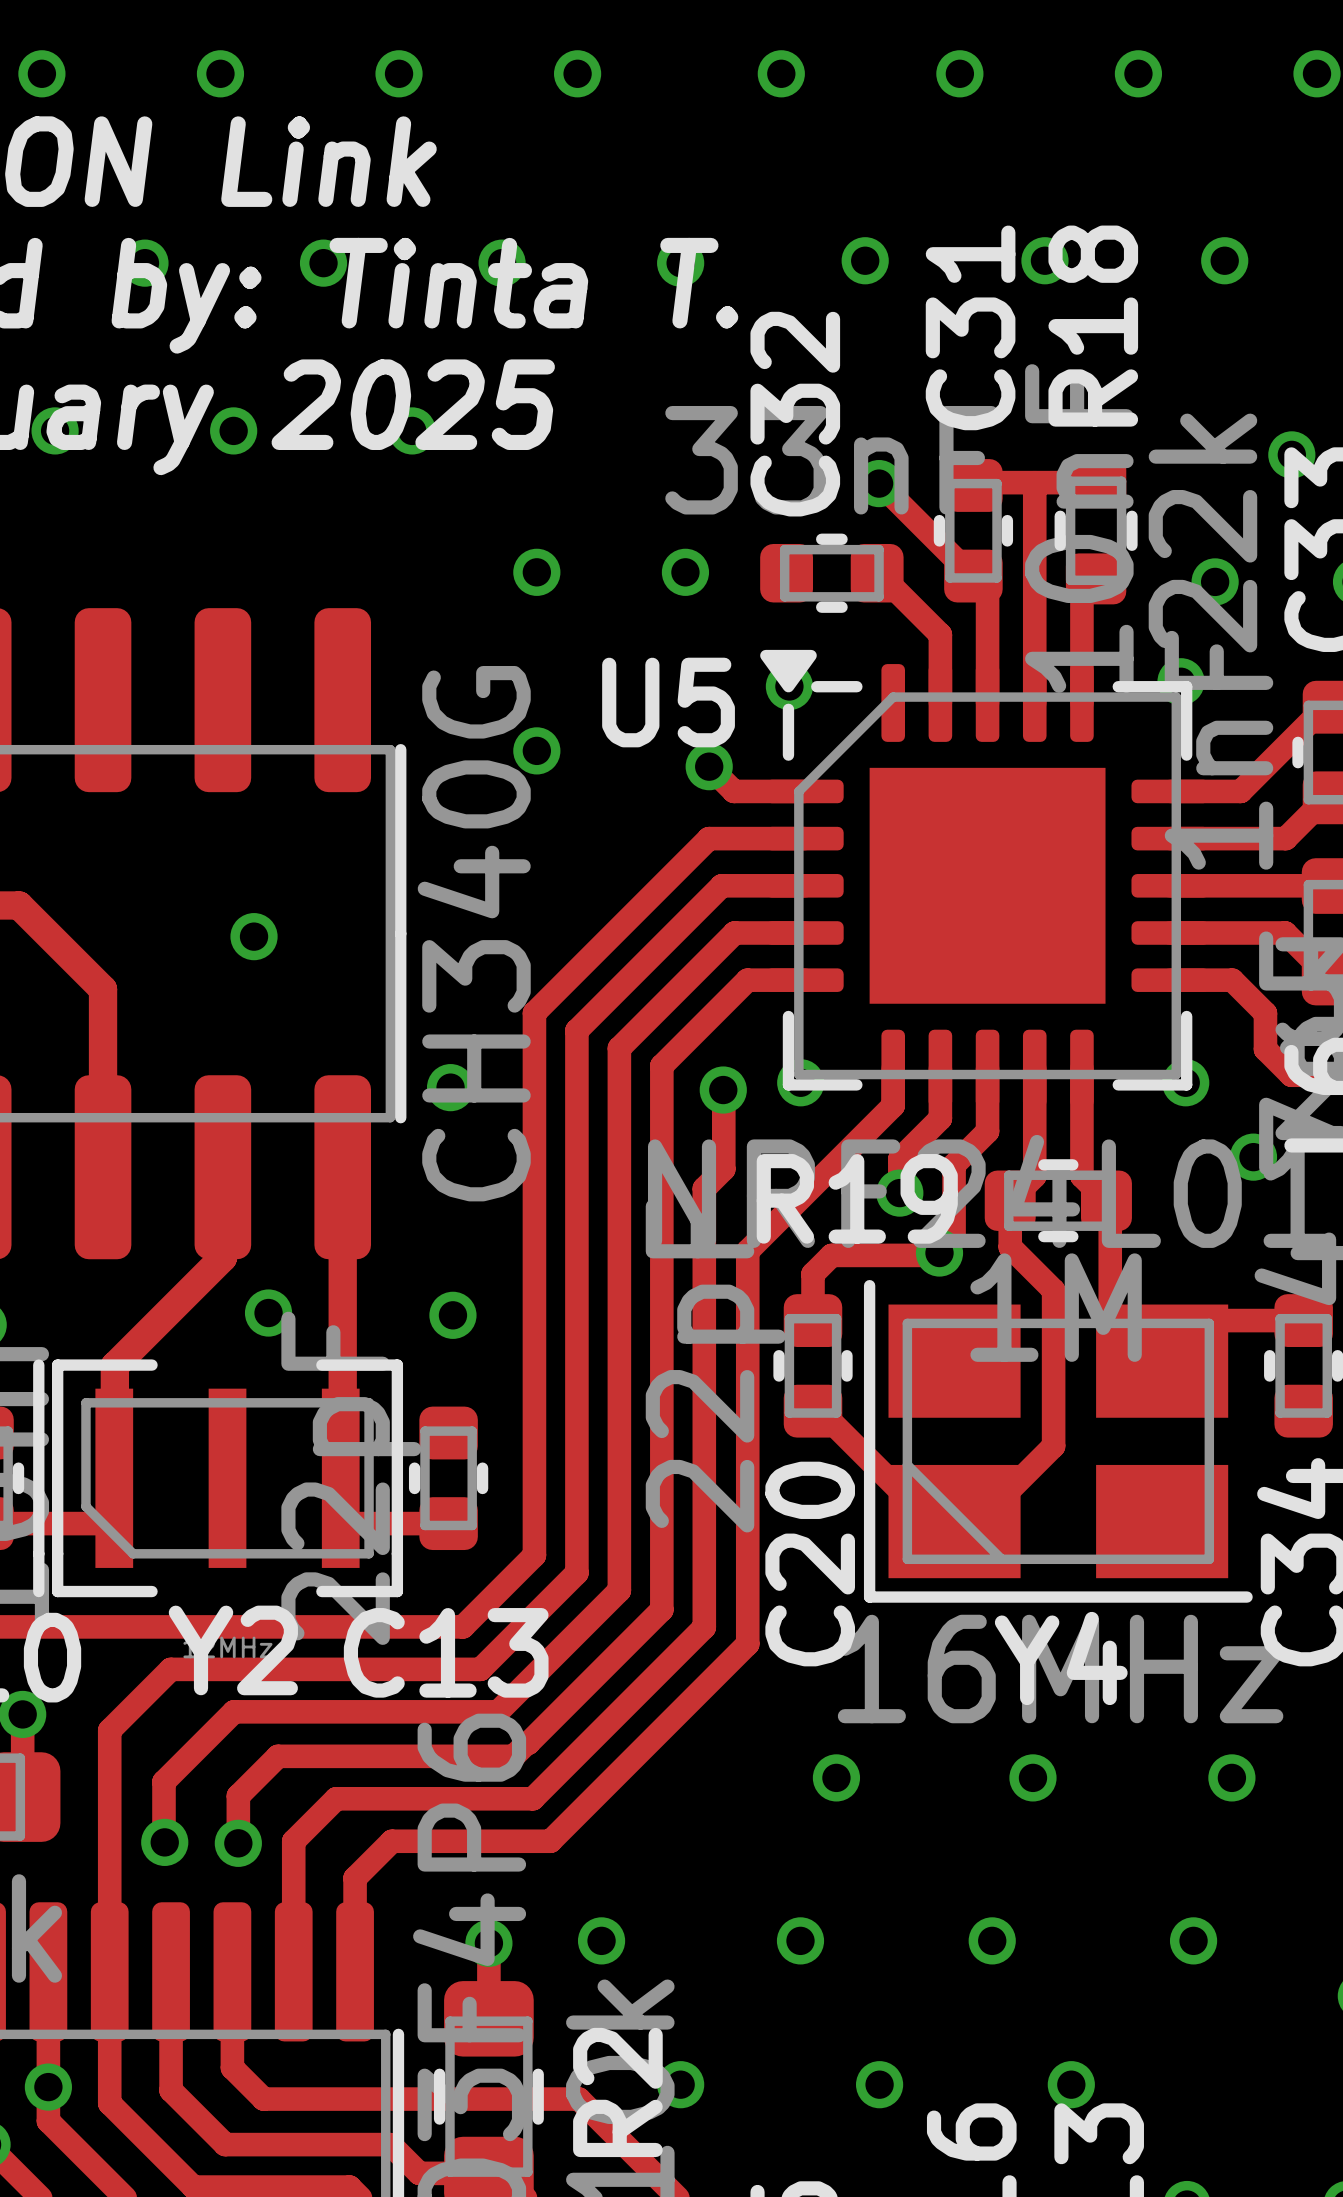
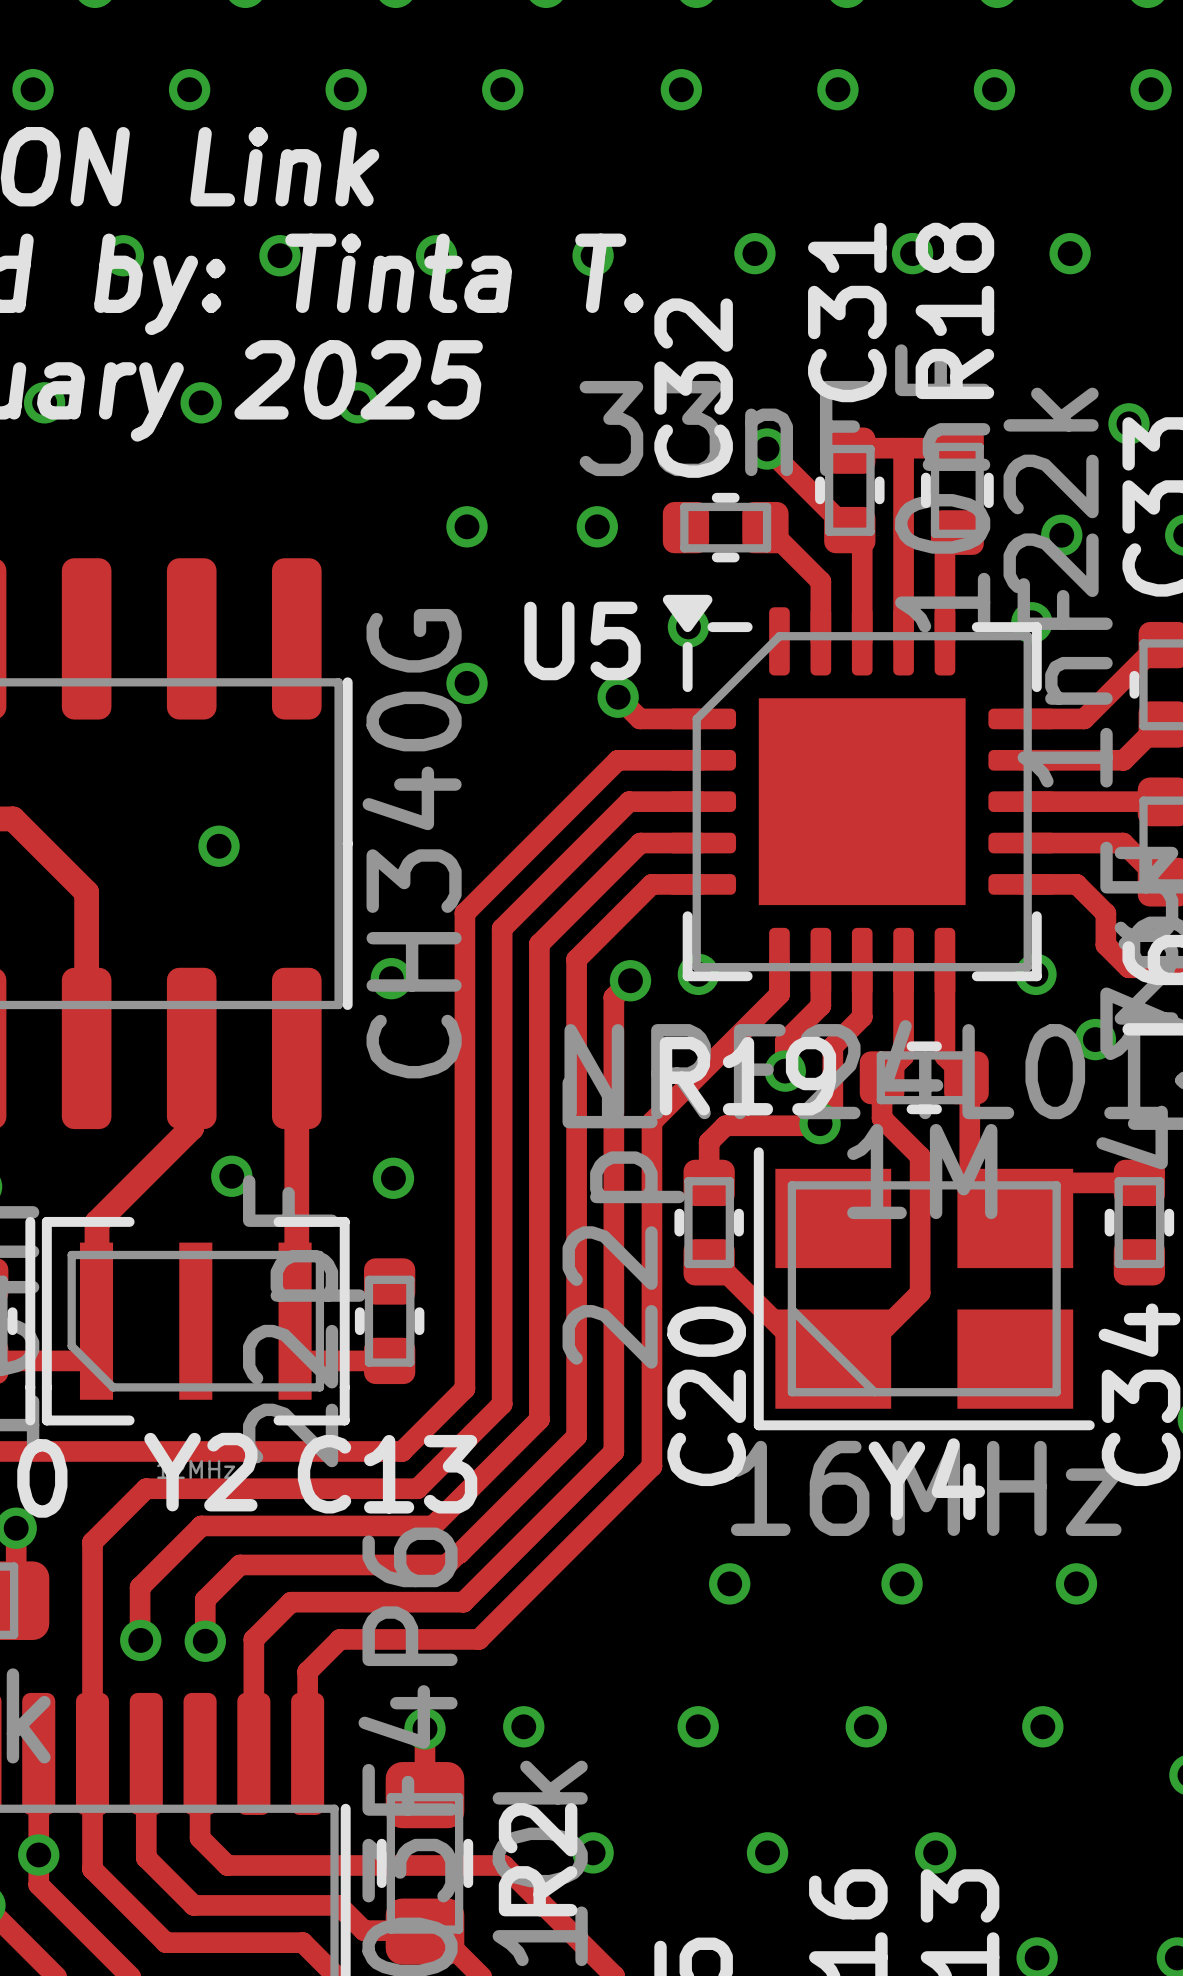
track: (723, 1090) (723, 1169) (704, 1188) -> (630, 980) (613, 997) (613, 1067)

